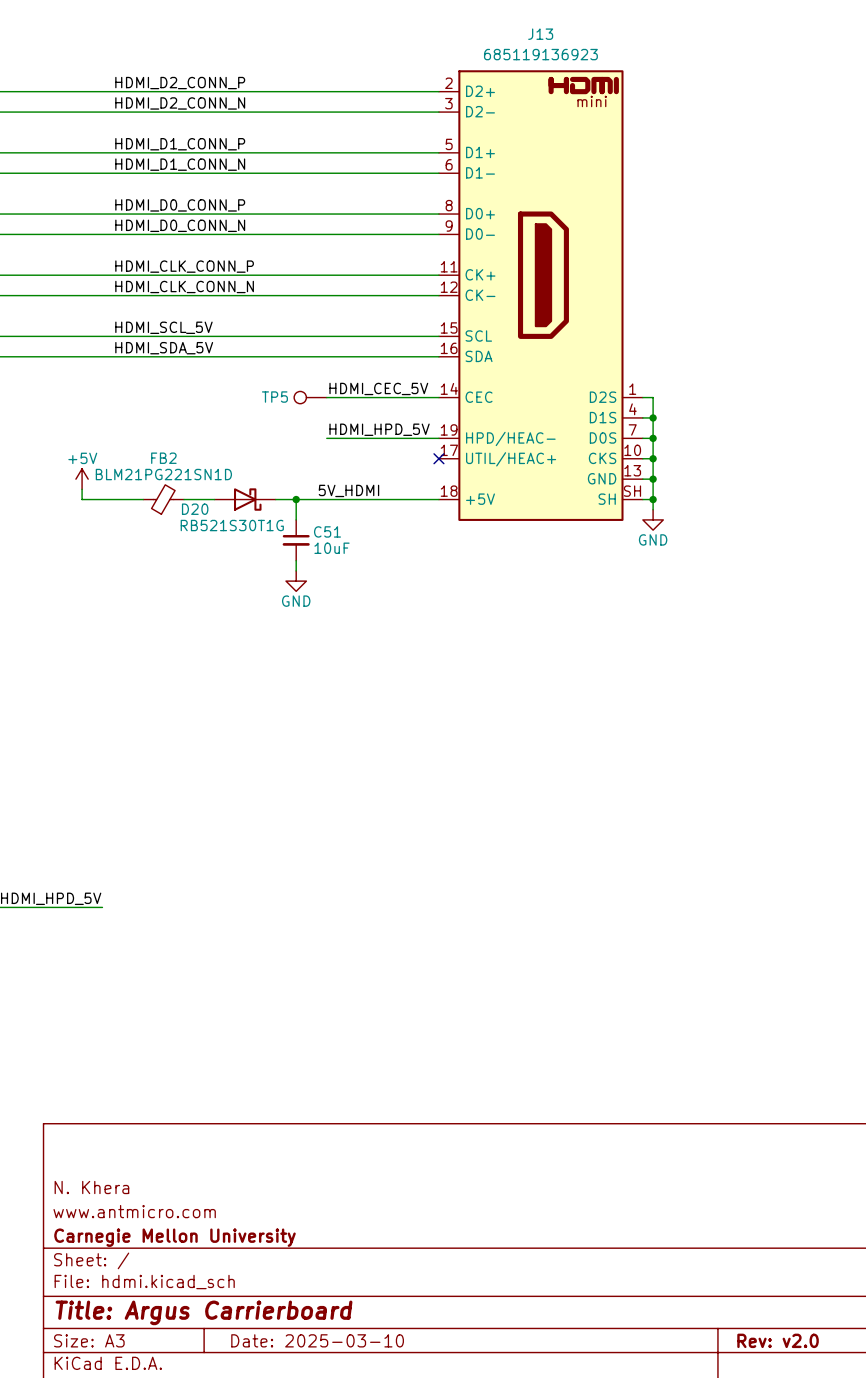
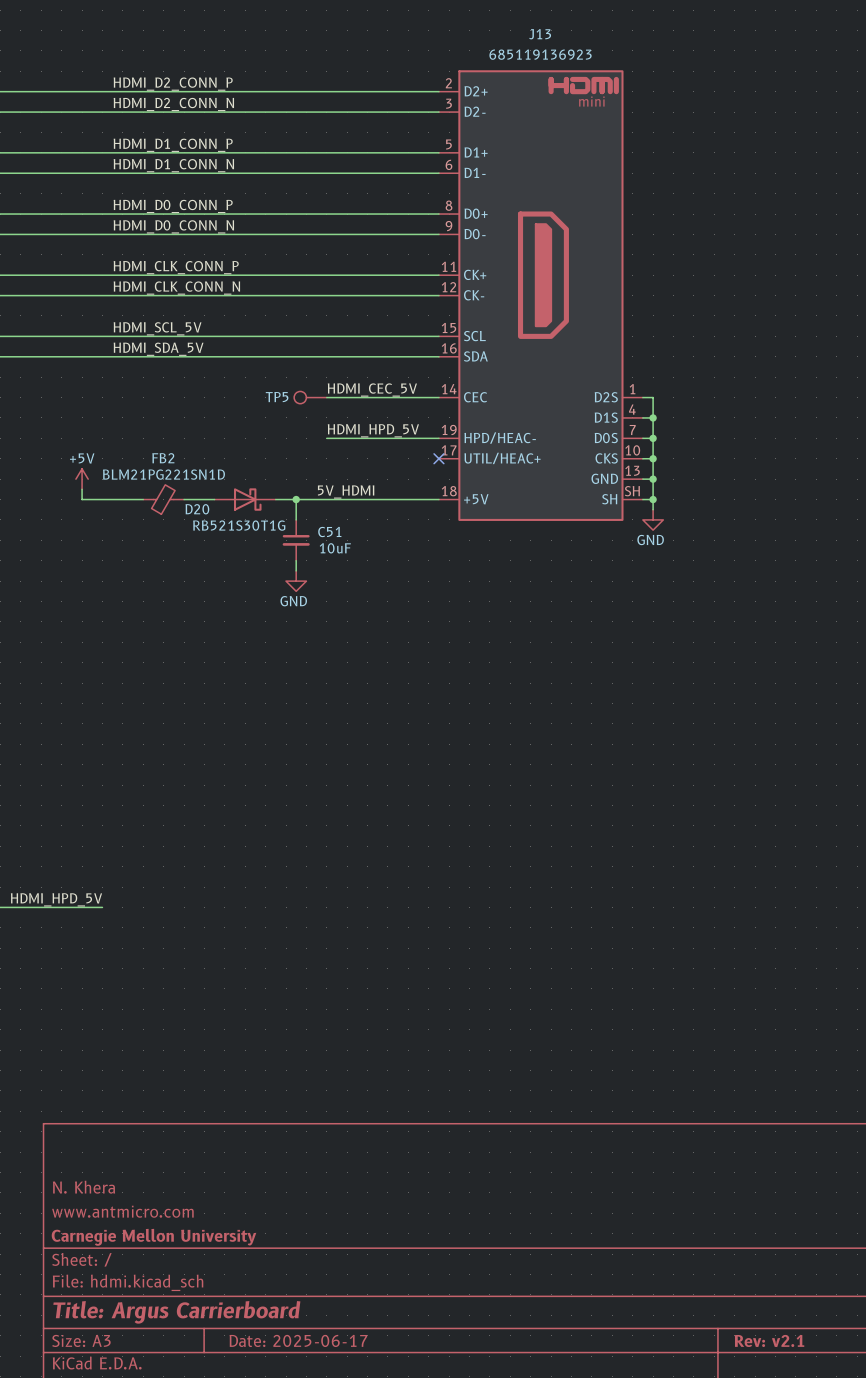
title block: Date: 2025-03-10 (317, 1340) -> Date: 2025-06-17 (298, 1340)
title block: Rev: v2.0 (778, 1340) -> Rev: v2.1 (769, 1340)

